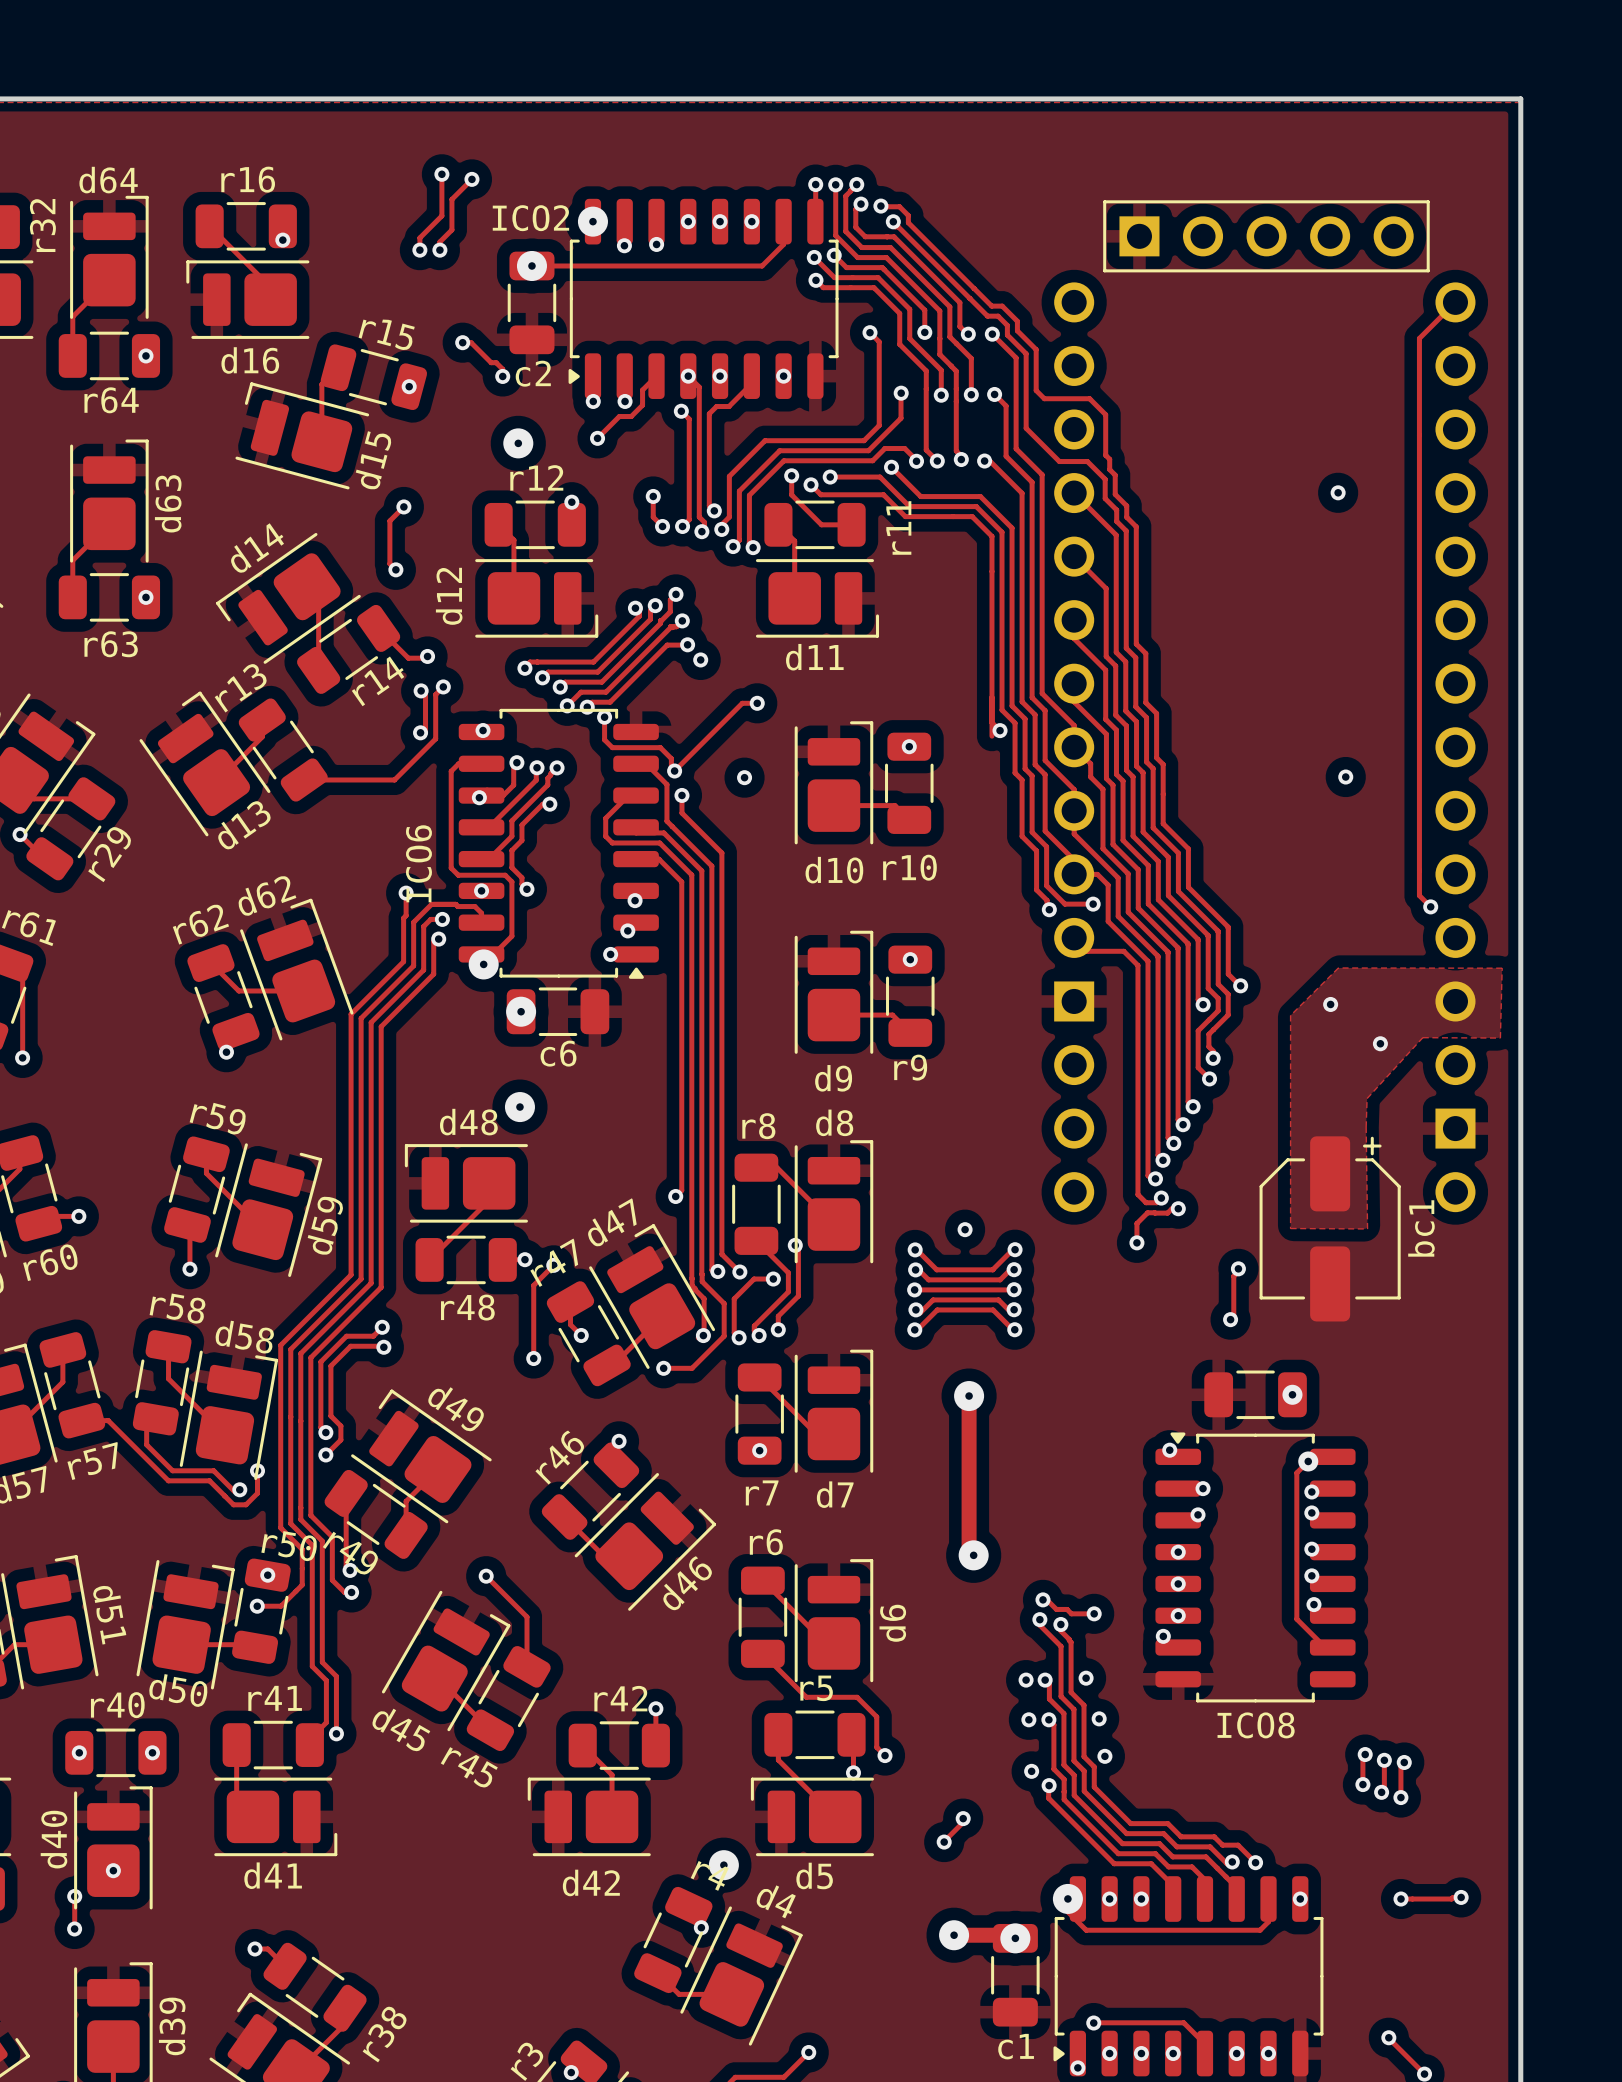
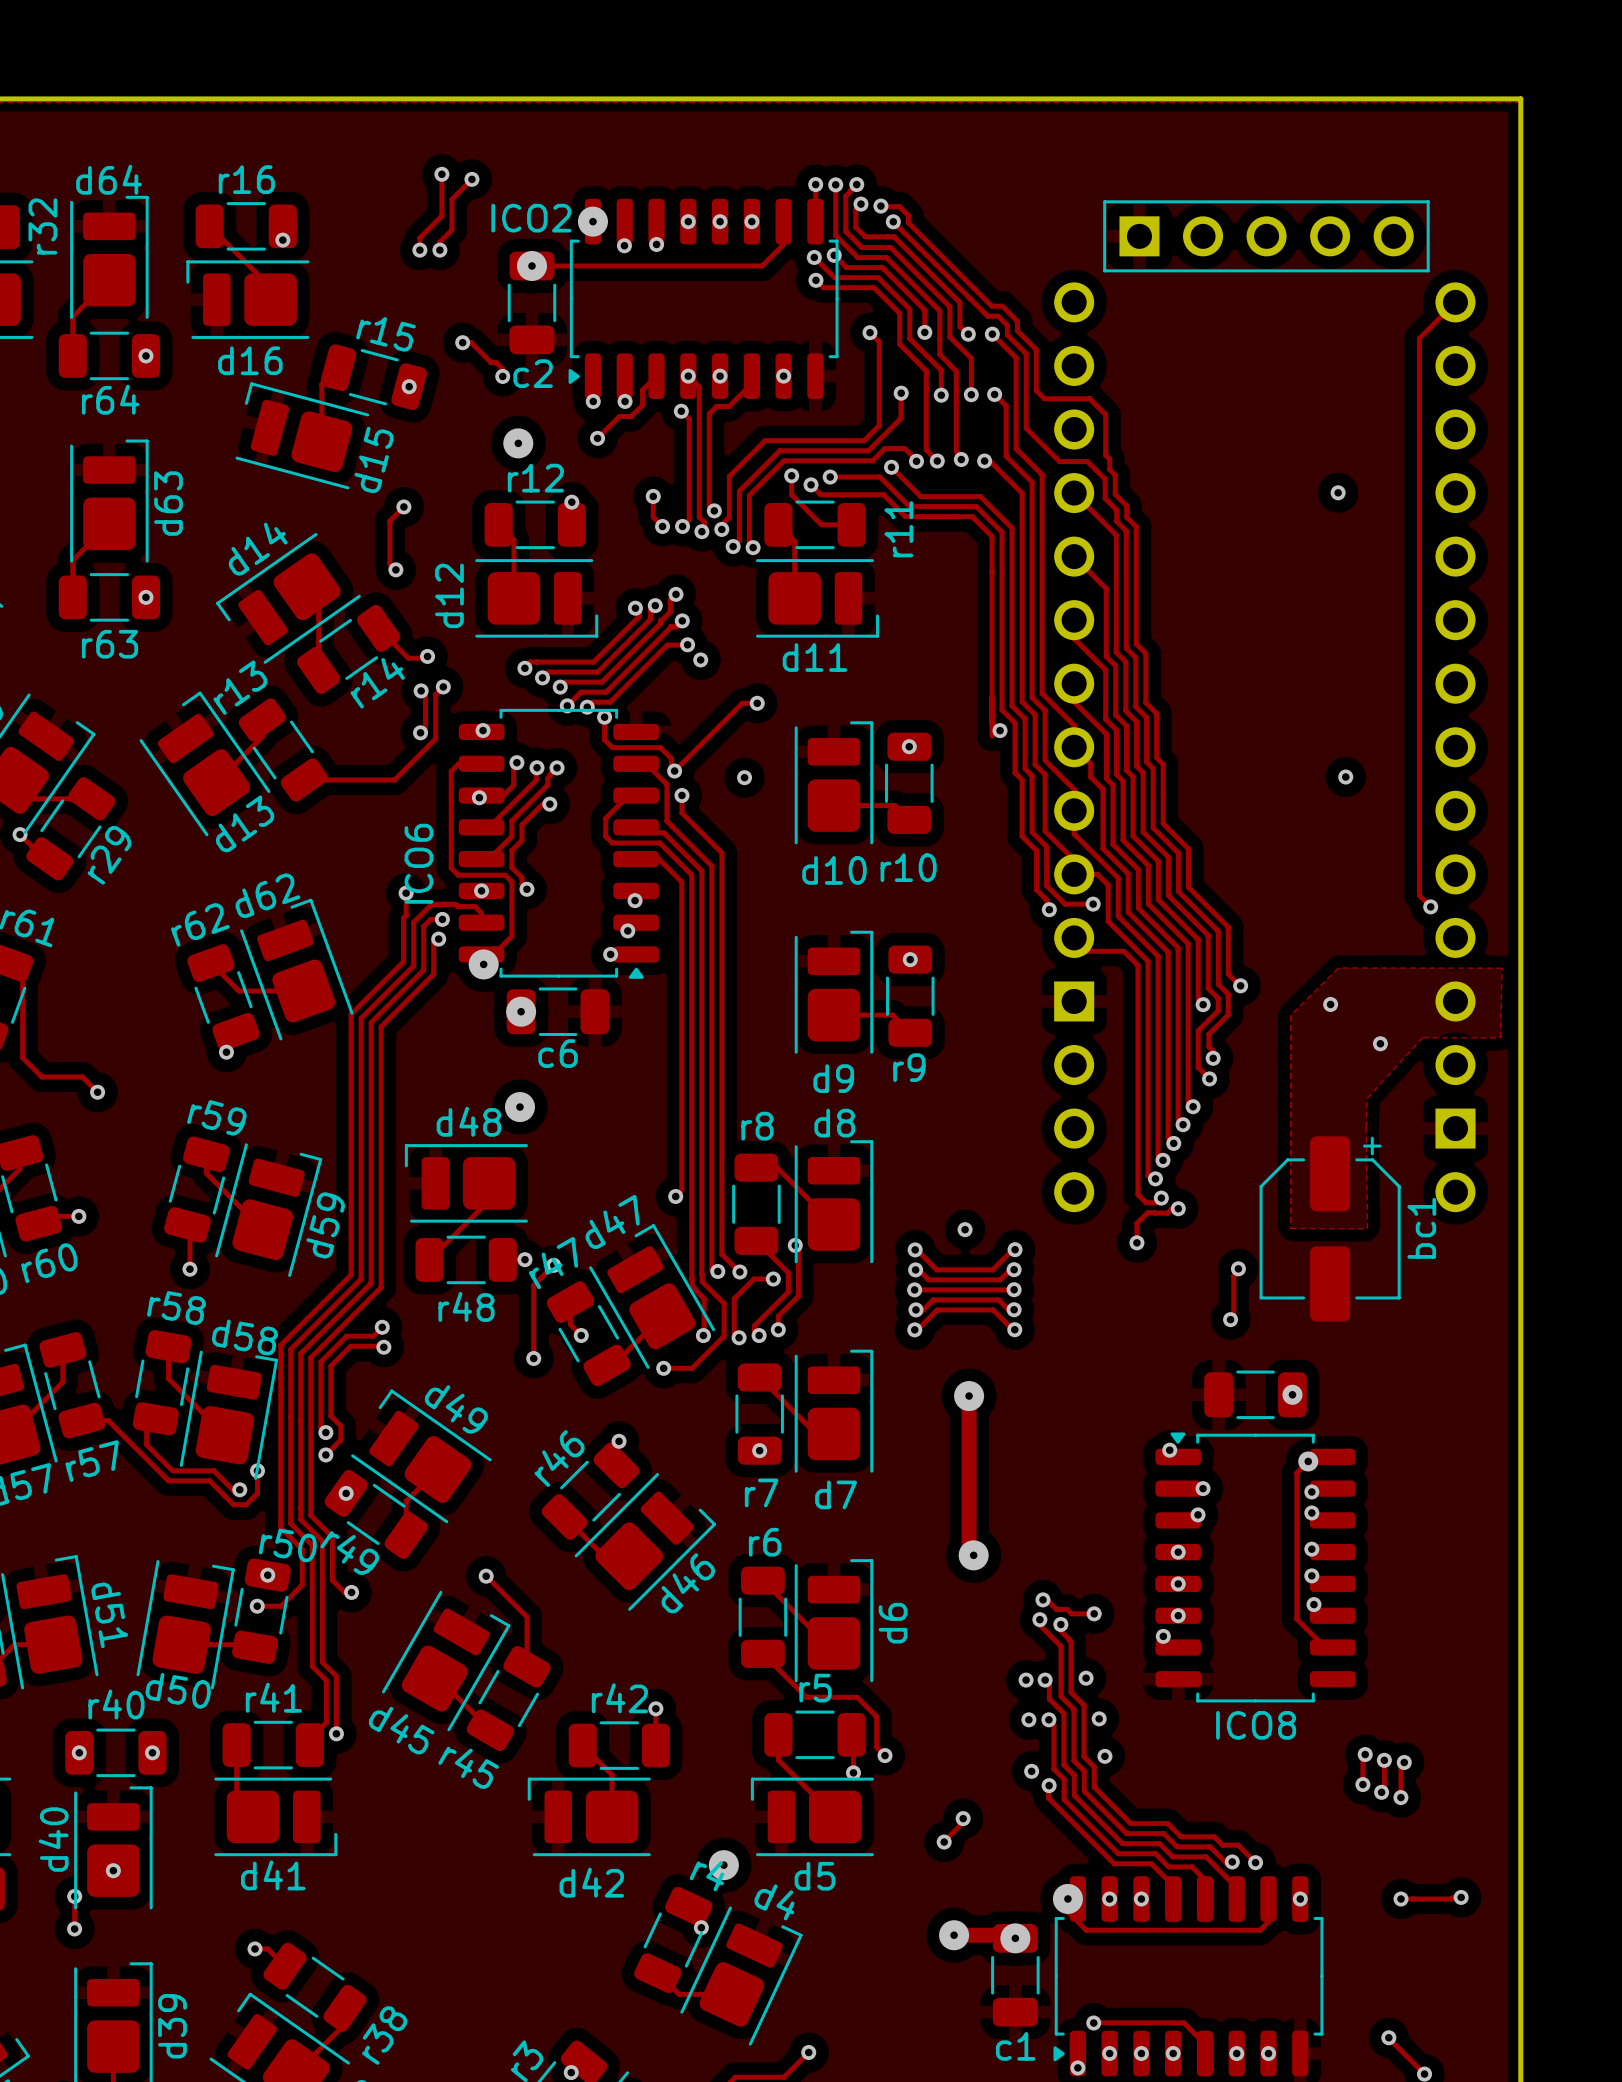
track: none -> (22, 1057) (41, 1076) (82, 1076) (97, 1092)
via position: (22, 1057) -> (97, 1092)
track: (346, 1493) (346, 1566) (350, 1570) -> none
via position: (350, 1570) -> (346, 1493)

